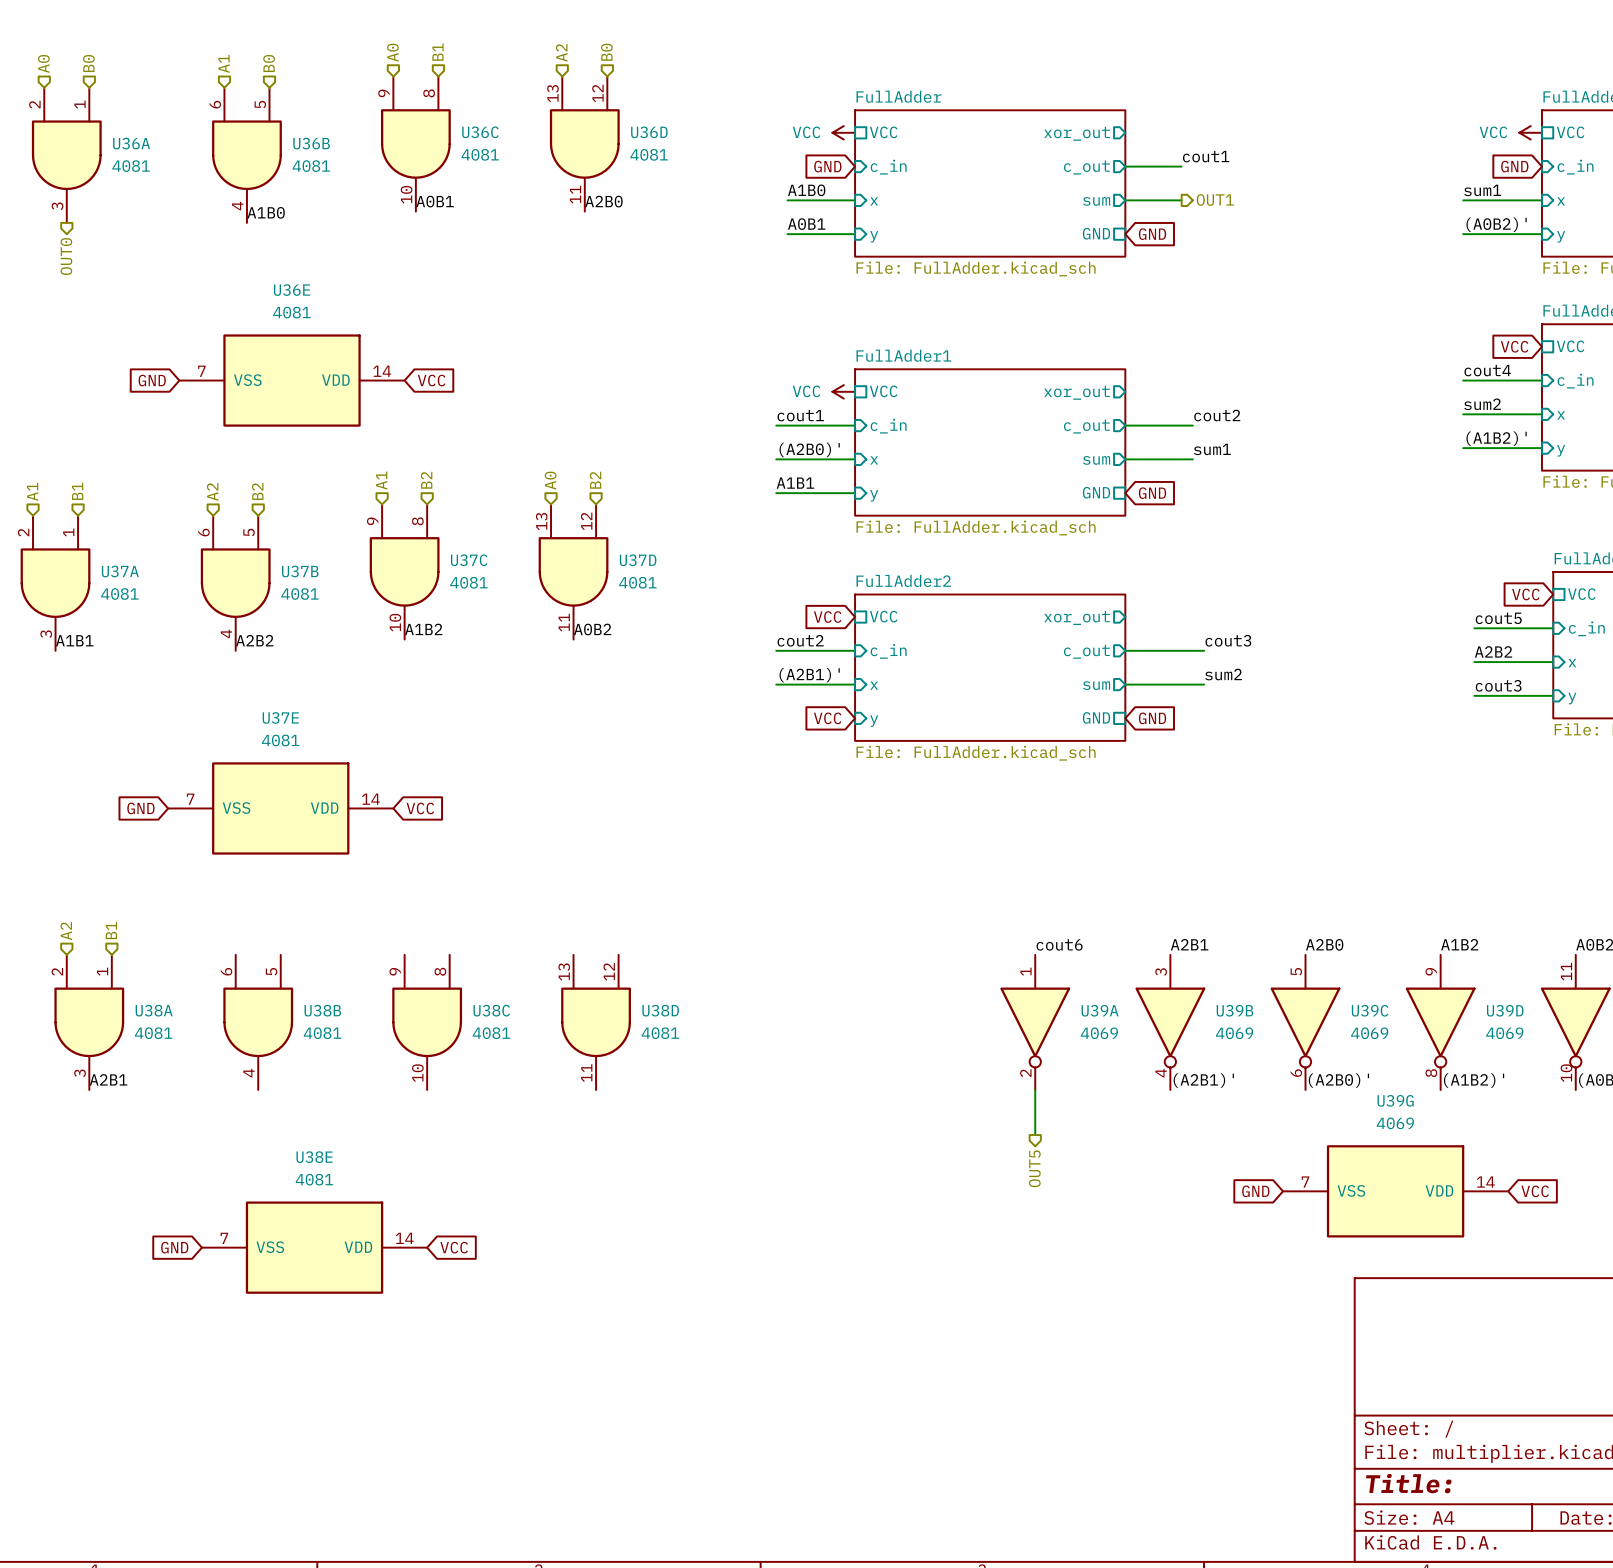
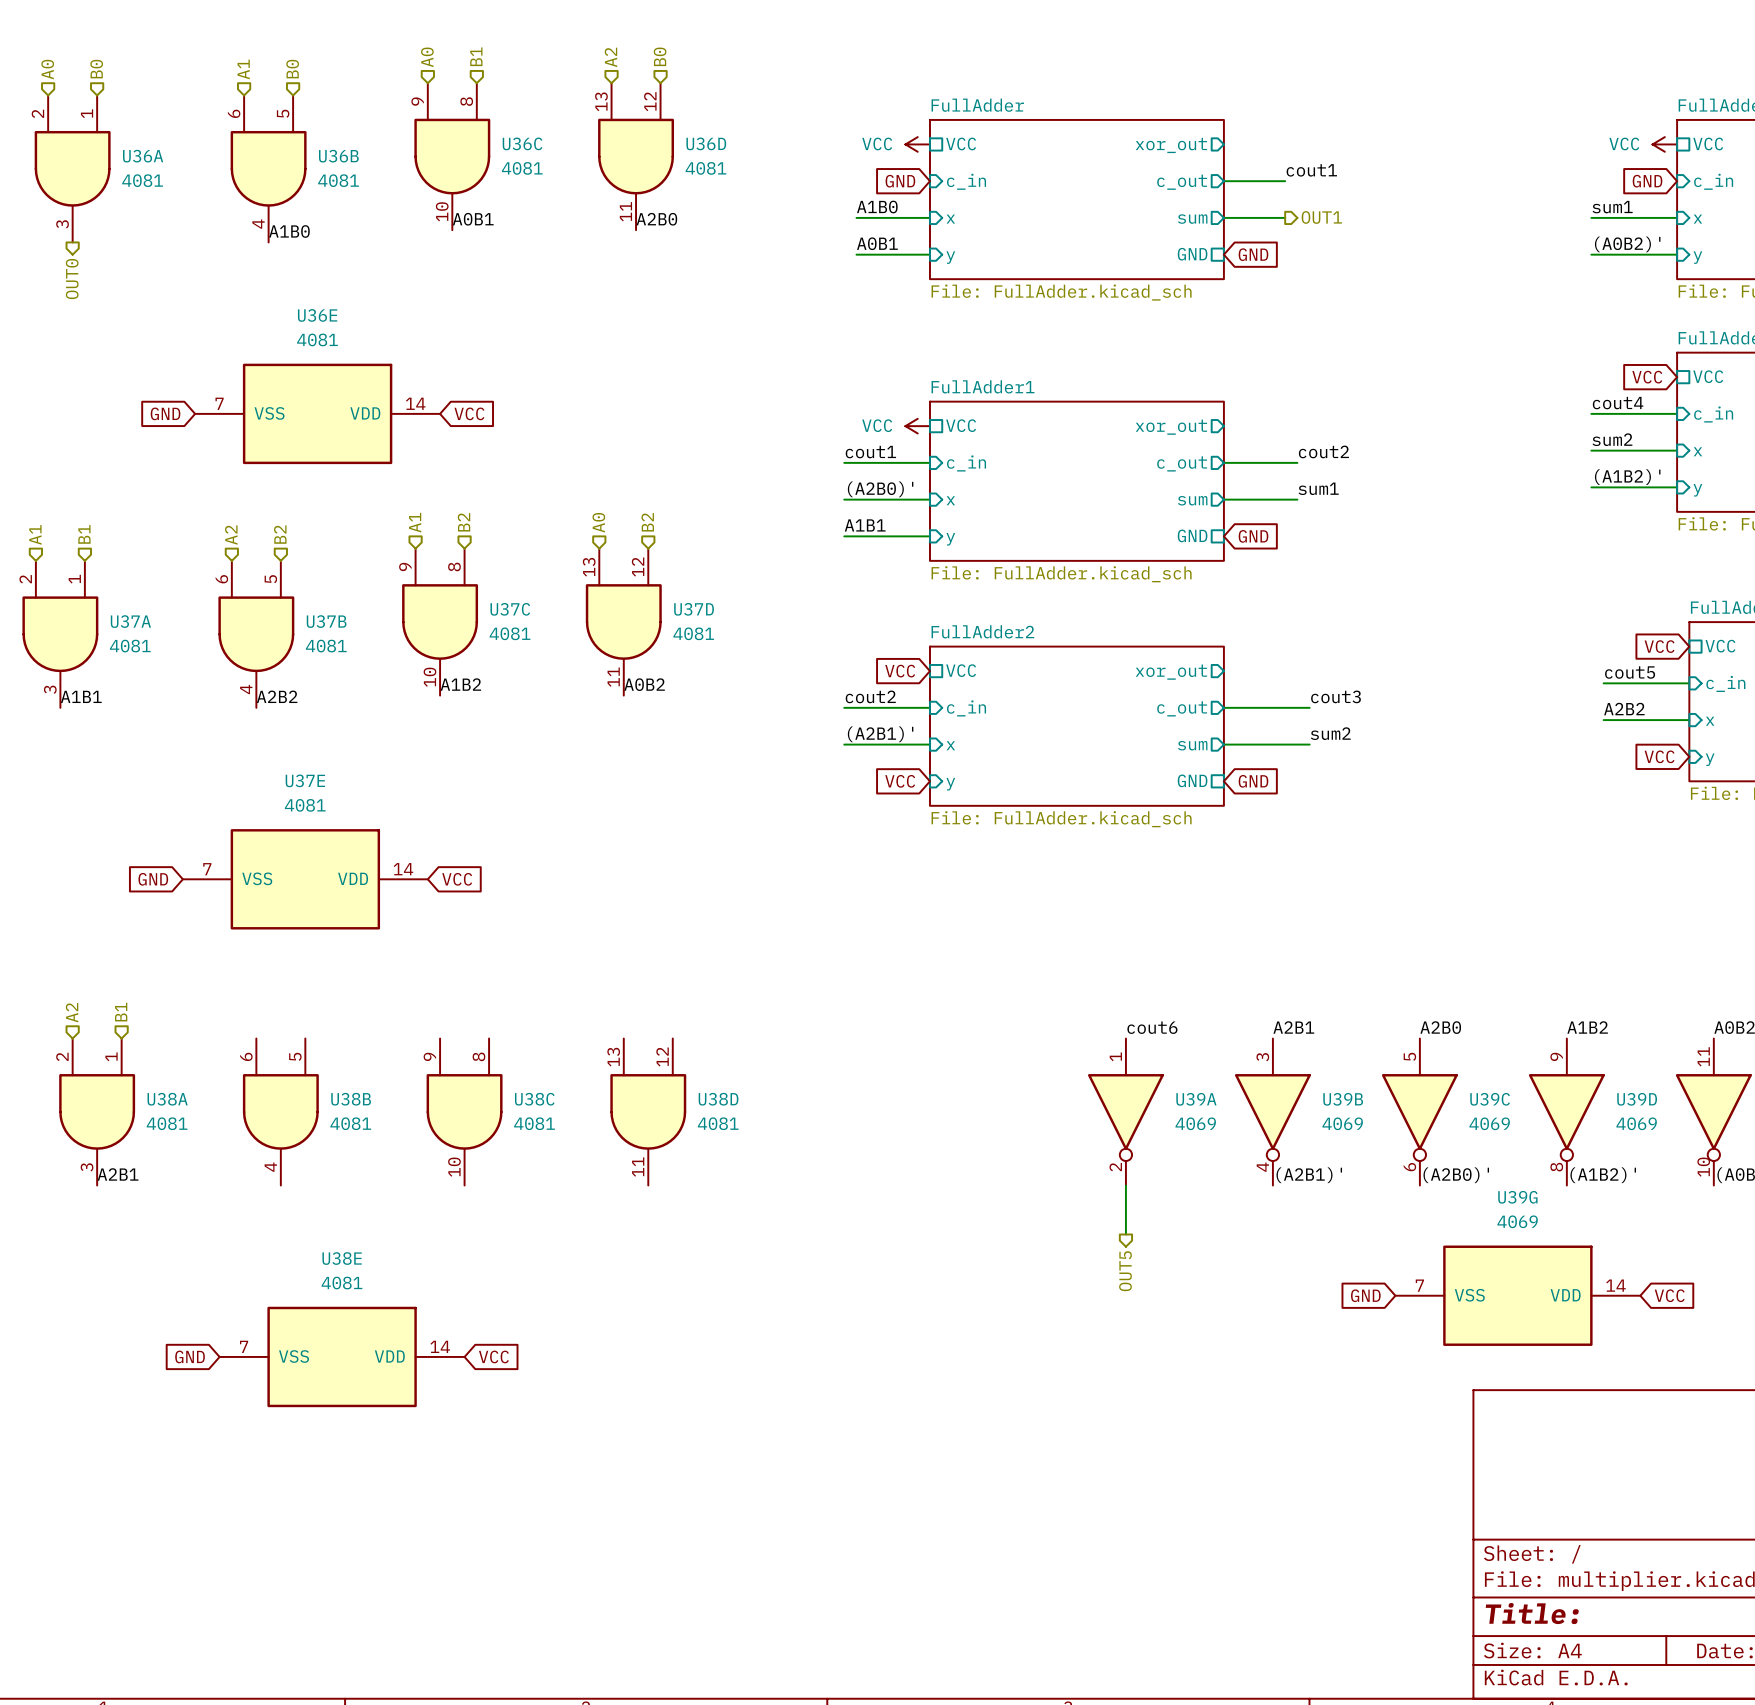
label: cout3 (1498, 685) -> none
wire: (1474, 695) (1553, 695) -> none
global label: none -> VCC (1659, 756)

